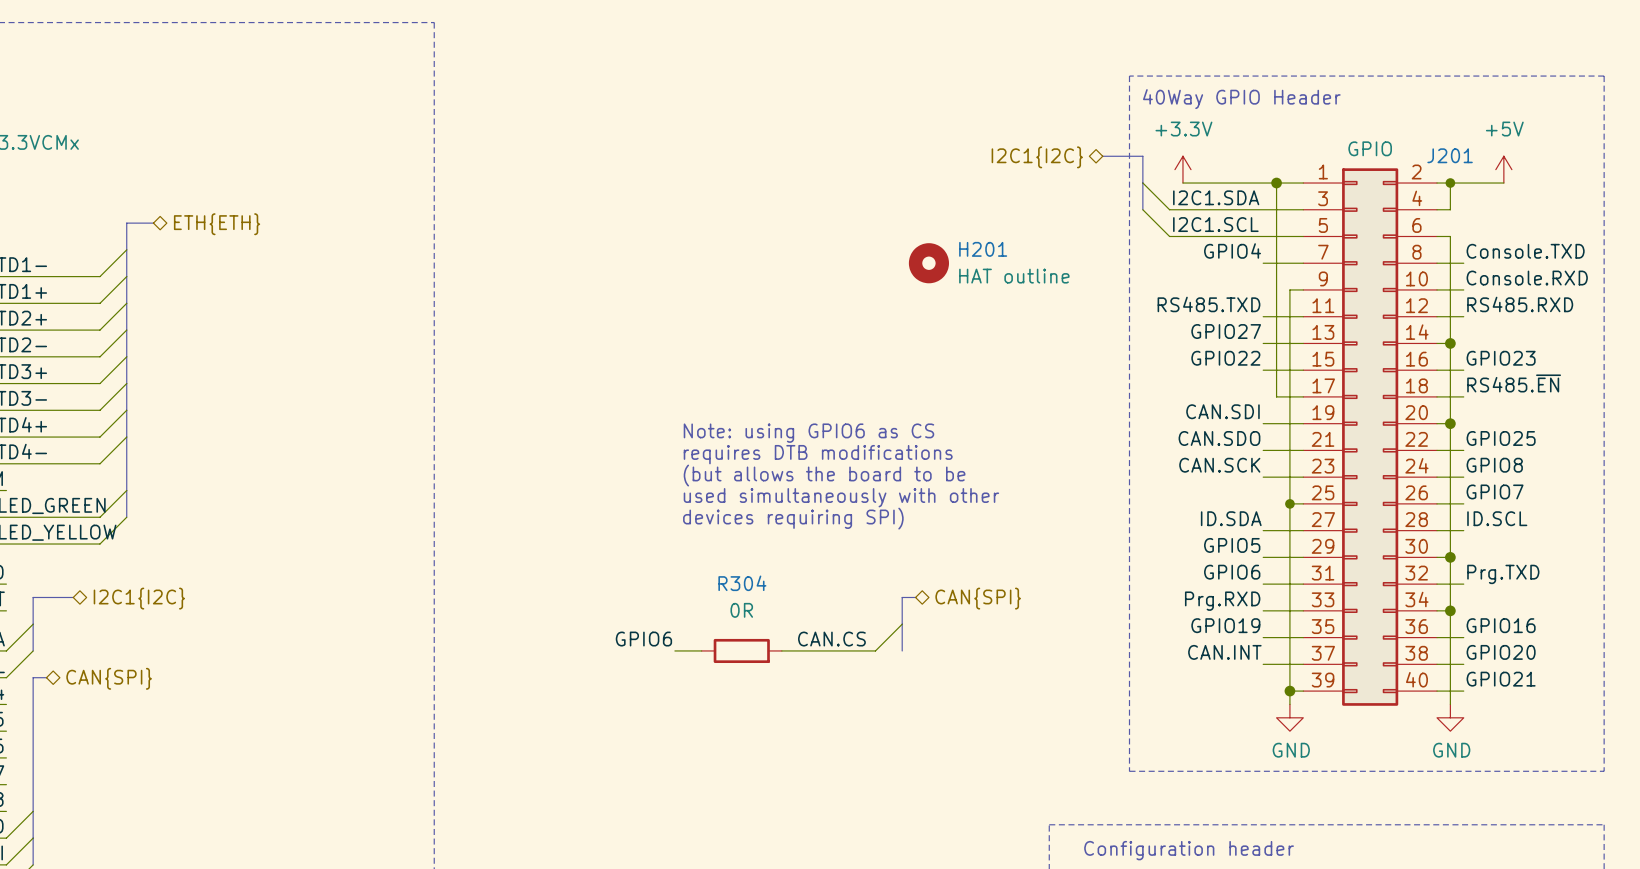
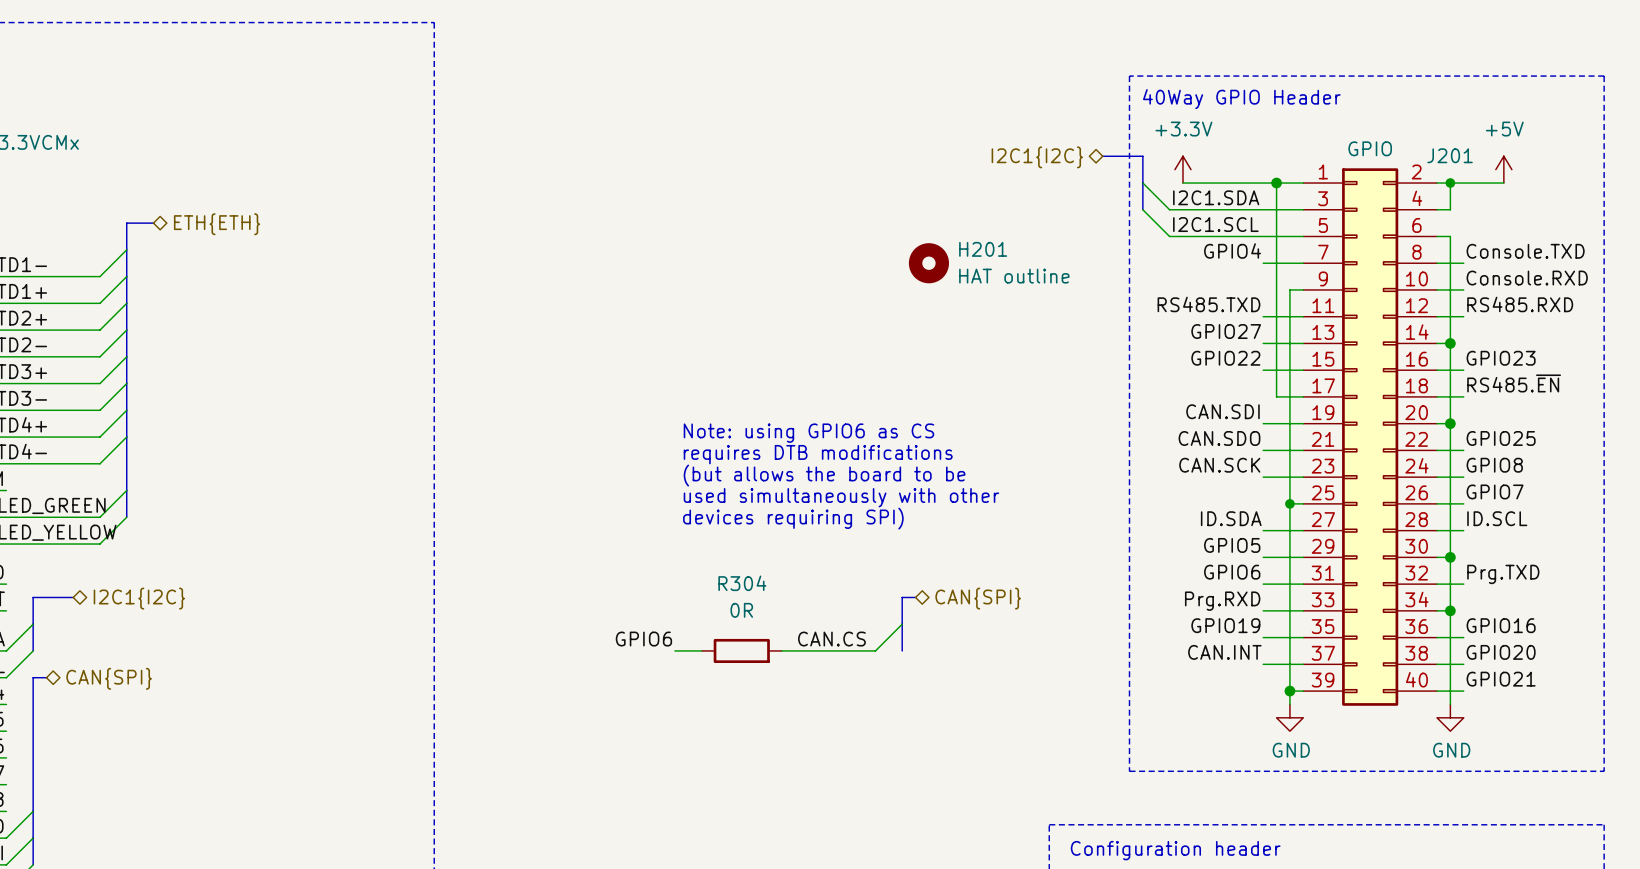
text position: Configuration header (1189, 850) -> Configuration header (1175, 850)

